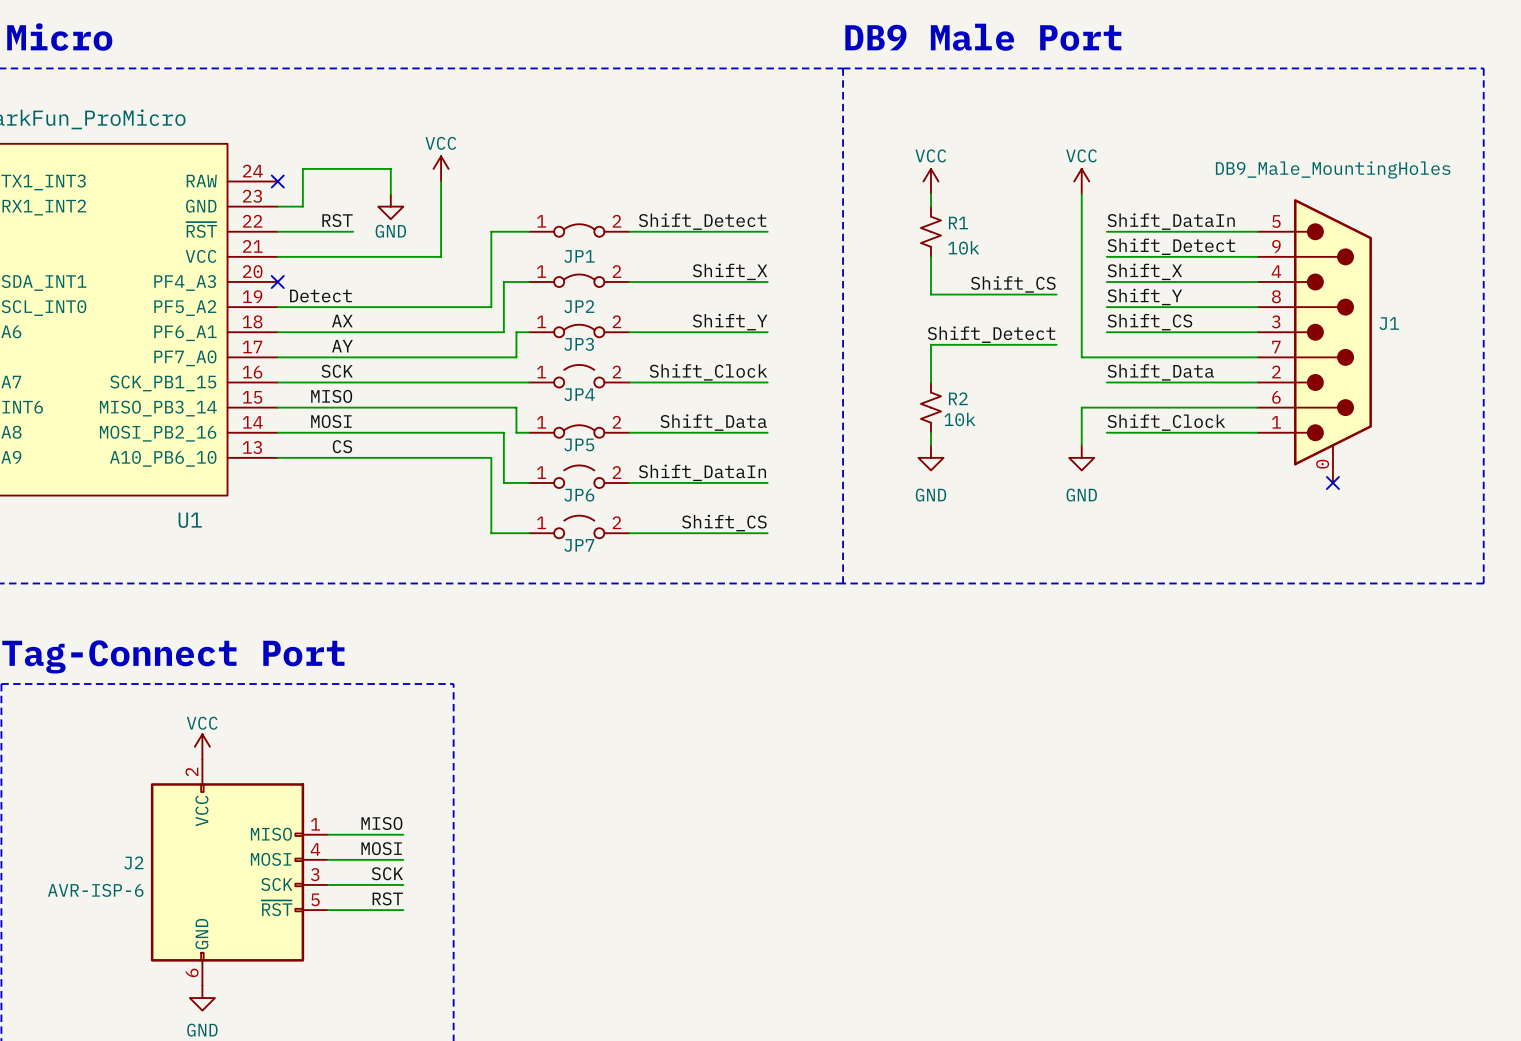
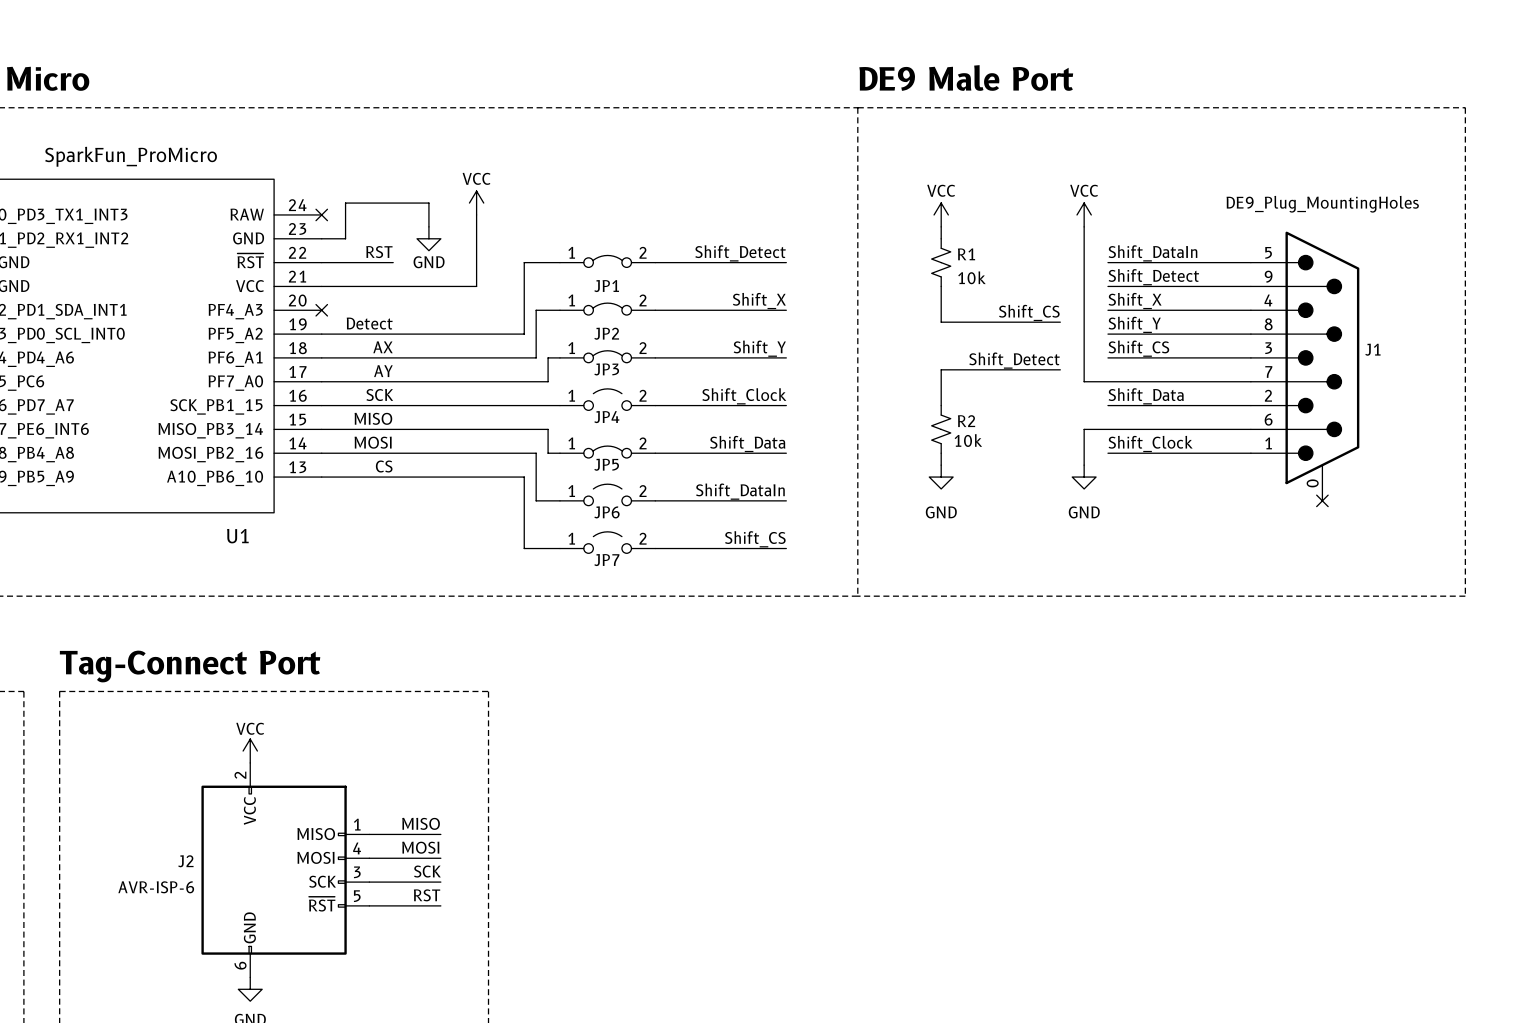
text: DB9 Male Port (983, 37) -> DE9 Male Port (966, 77)
J1 value: DB9_Male_MountingHoles (1333, 169) -> DE9_Plug_MountingHoles (1322, 204)

